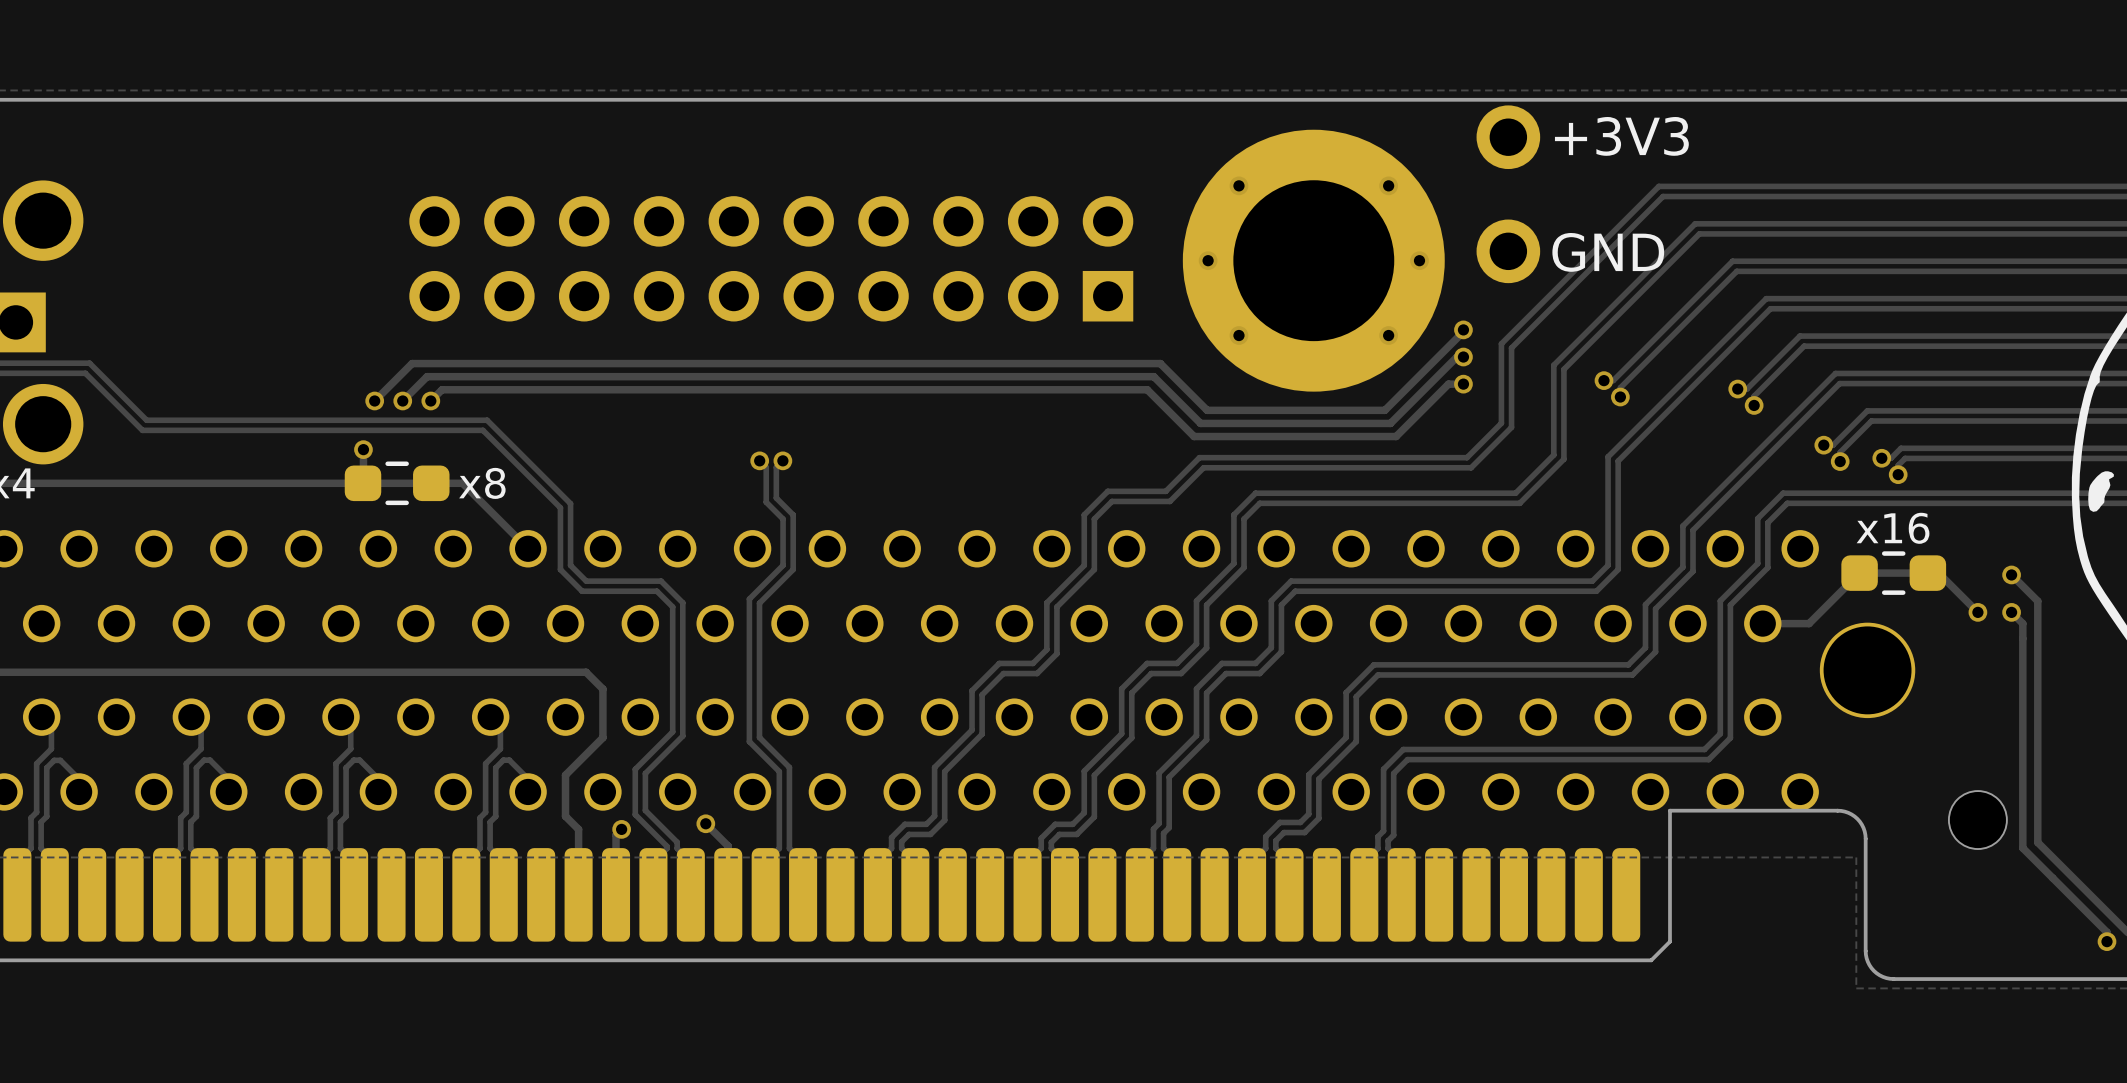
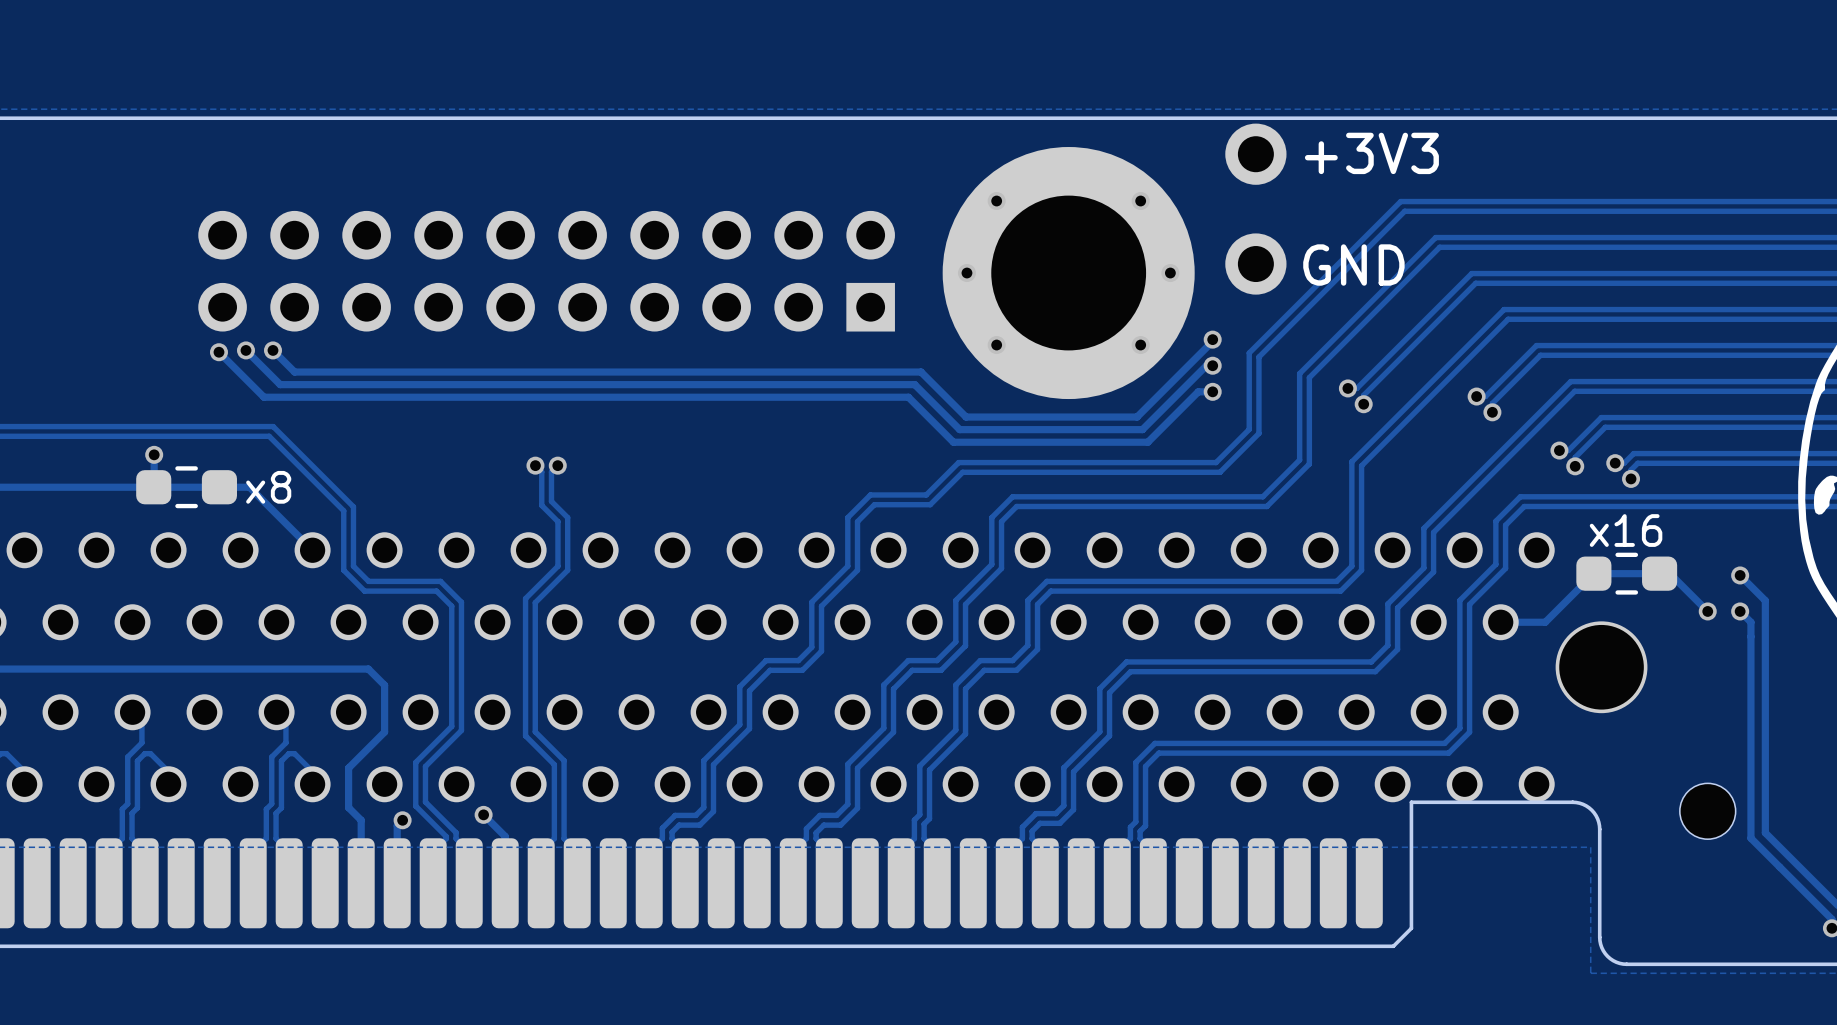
via: none -> (245, 350)
via: none -> (272, 350)
via: none -> (218, 352)
track: (509, 363) (412, 363) (374, 400) -> (294, 372) (272, 350)
track: (494, 376) (427, 376) (402, 400) -> (280, 384) (245, 350)
track: (477, 389) (442, 389) (430, 400) -> (263, 397) (218, 352)
via: (374, 400) -> none
via: (402, 400) -> none
via: (430, 400) -> none

